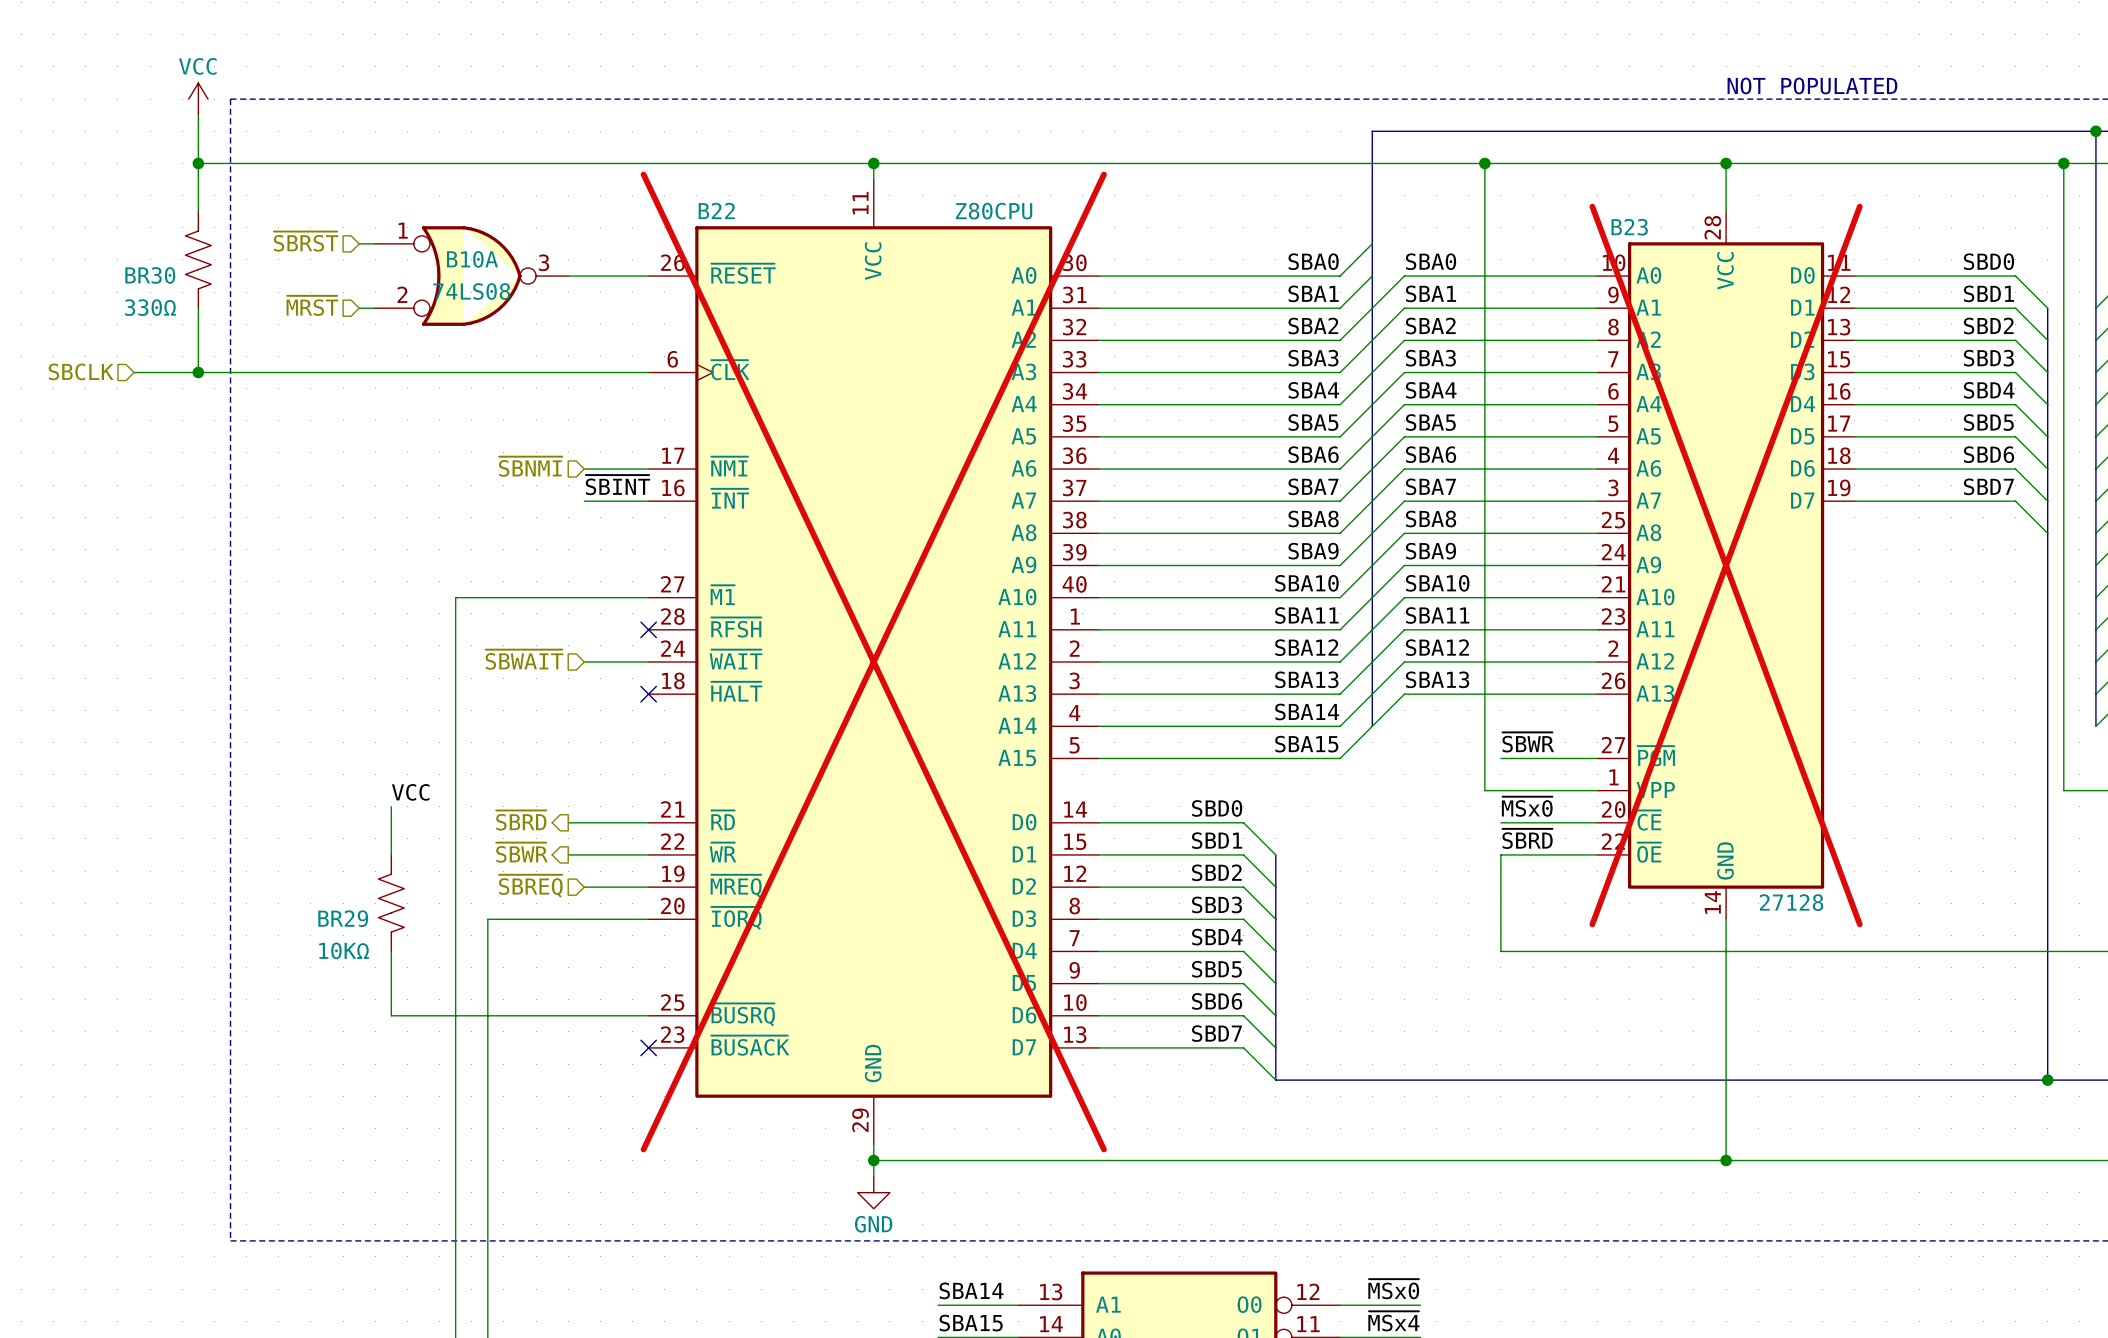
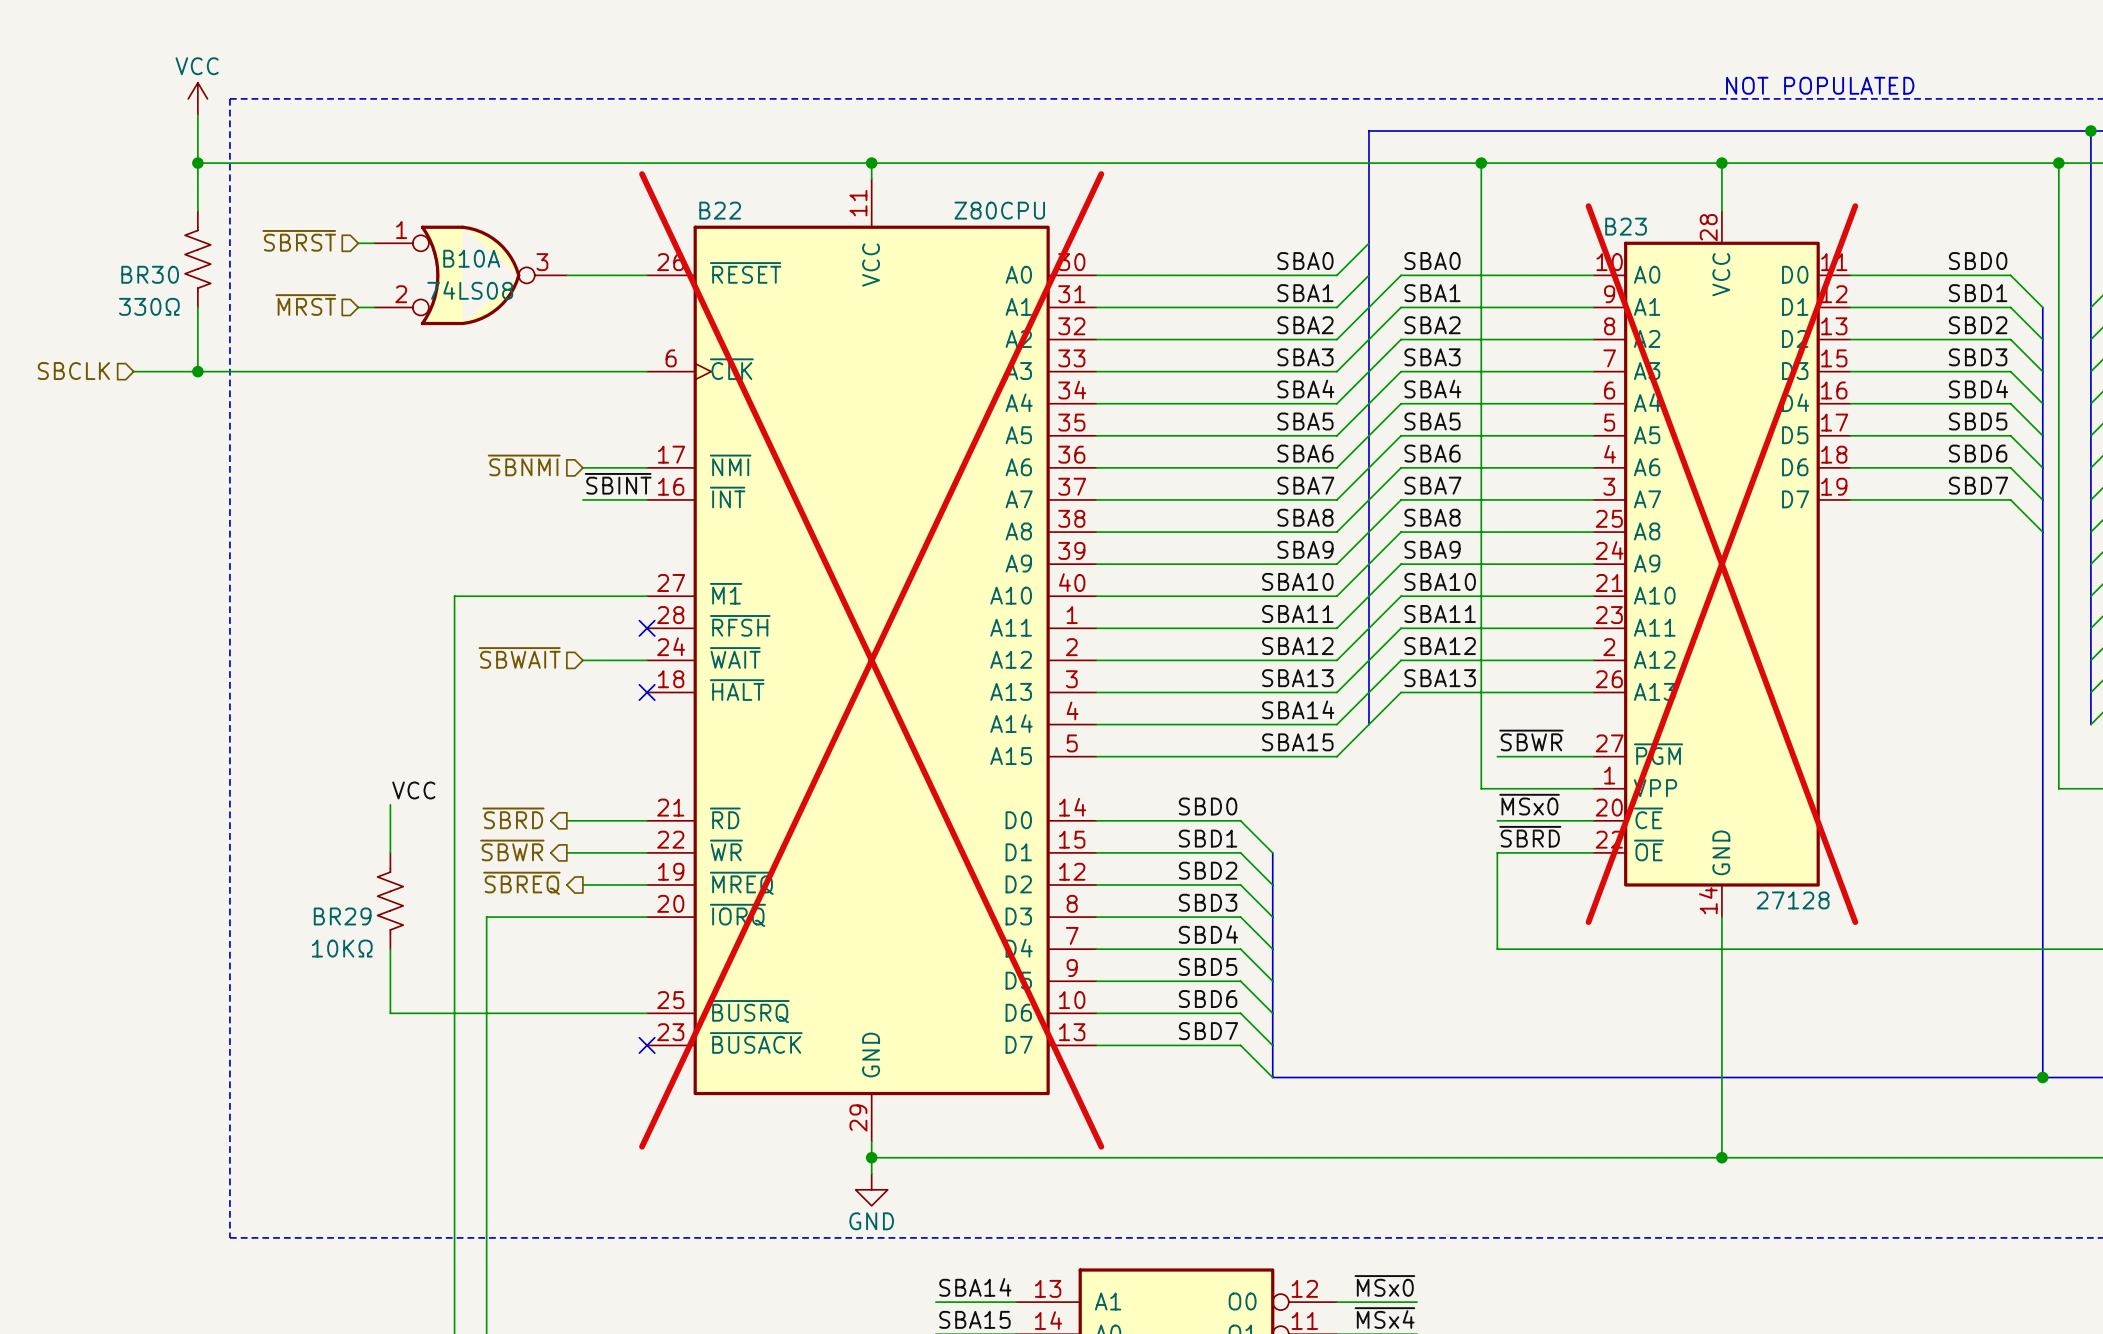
hierarchical label shape: input (530, 886) -> output (521, 883)

